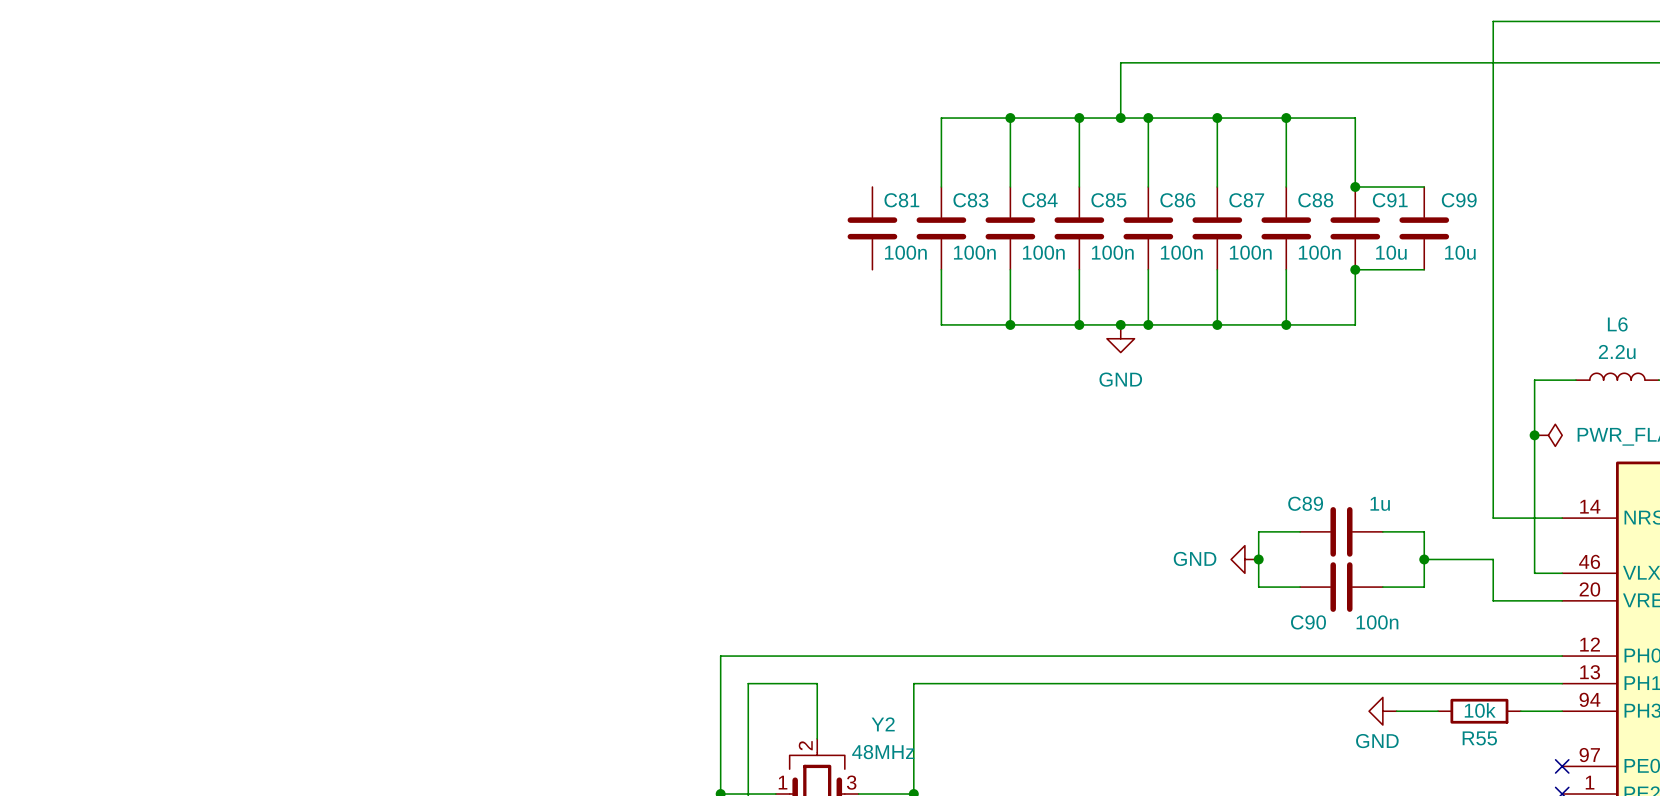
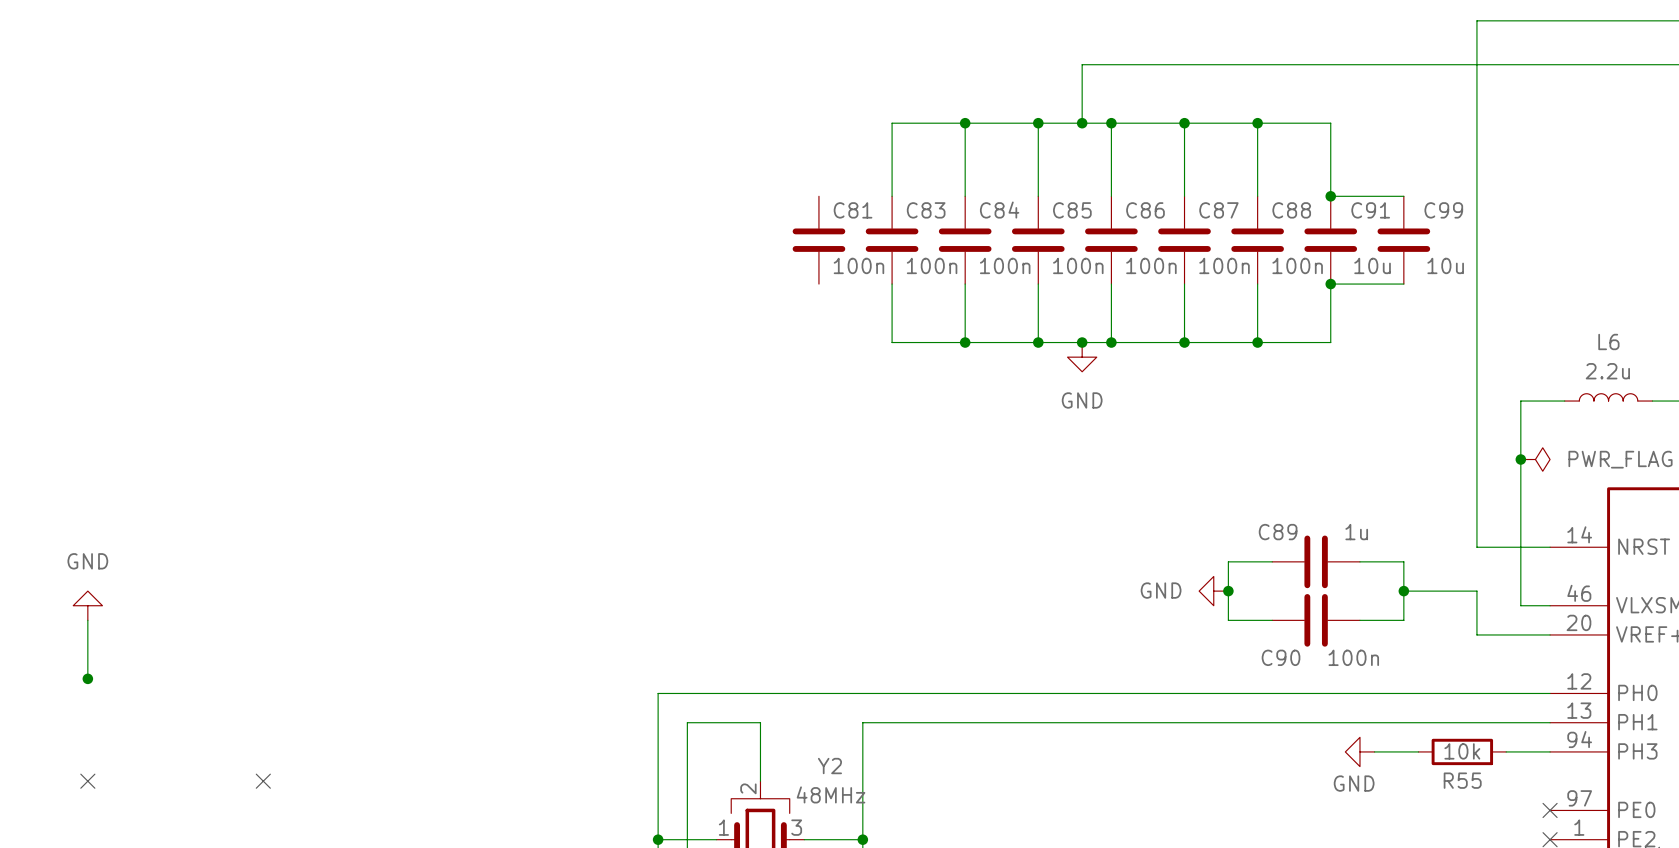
power symbol: none -> GND (87, 605)
wire: none -> (87, 620) (87, 678)
junction: none -> (87, 678)
no-connect mark: none -> (87, 781)
no-connect mark: none -> (263, 781)

